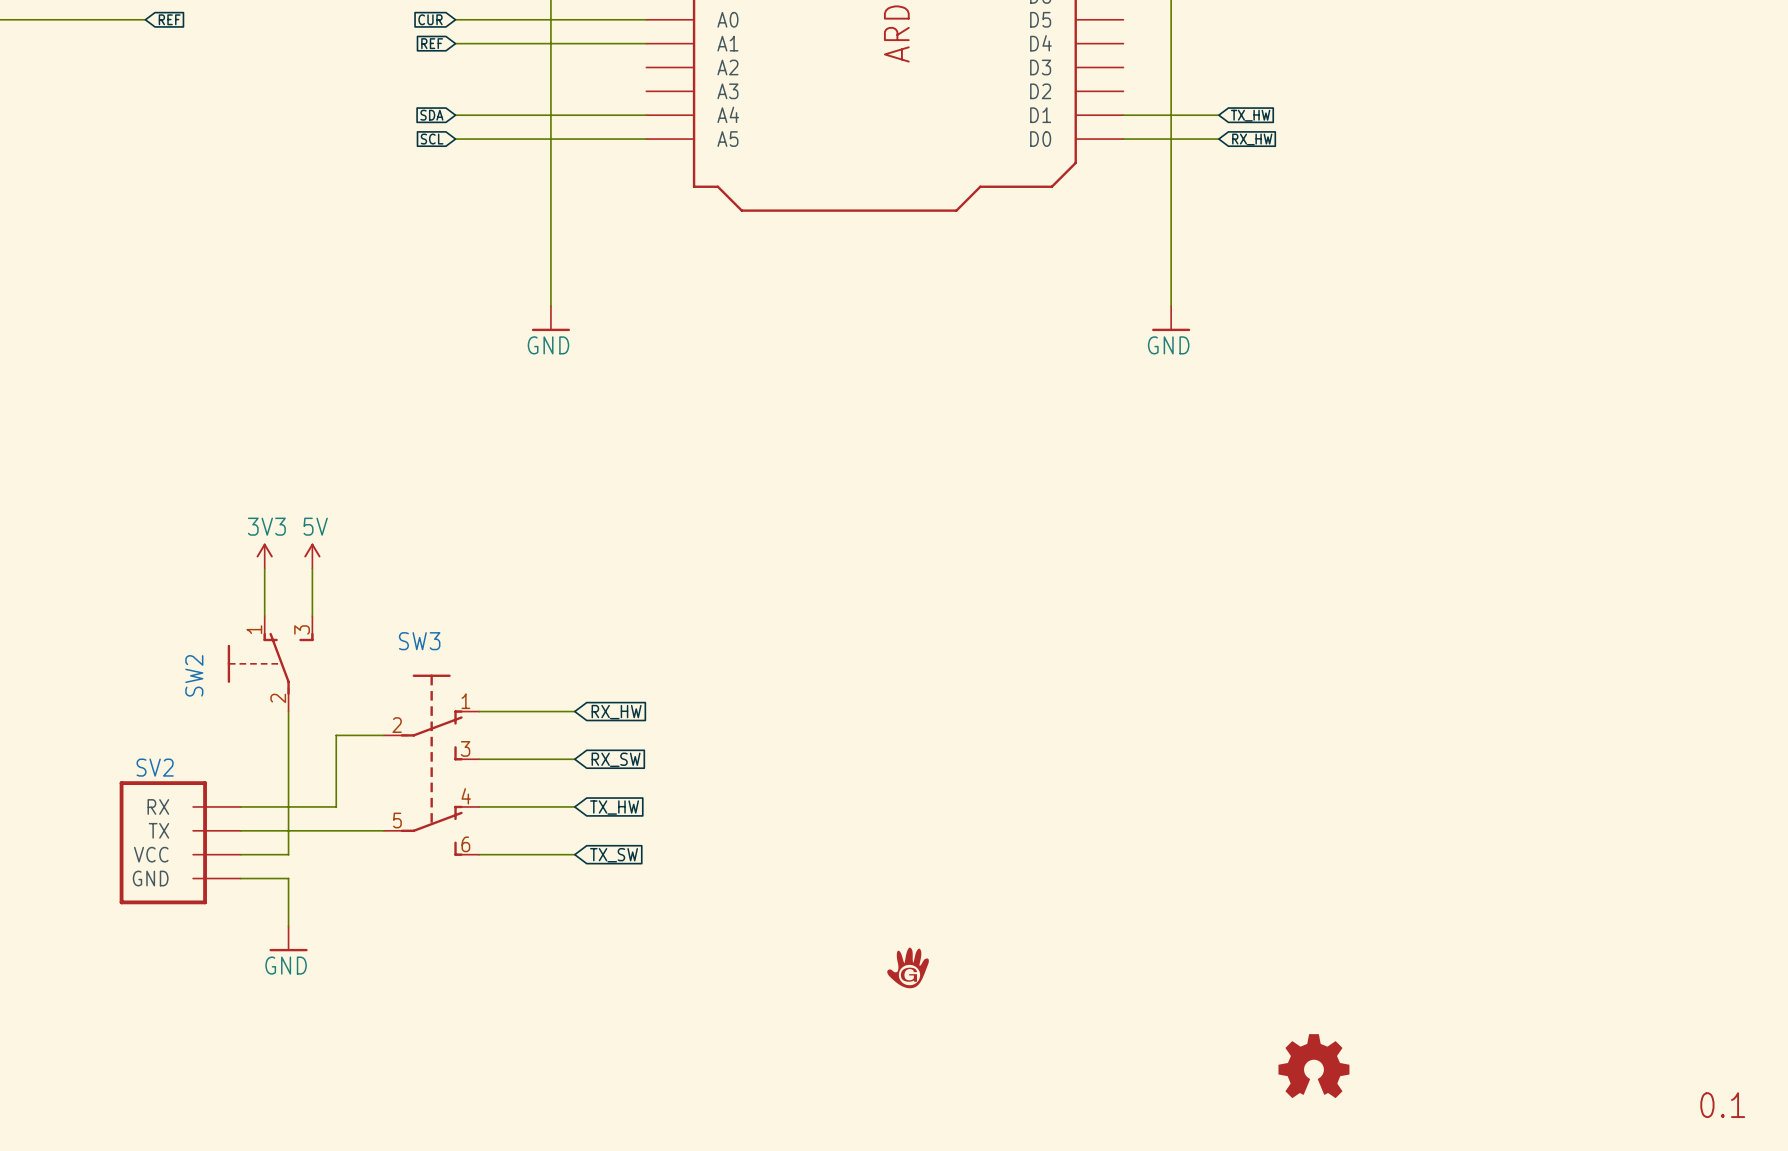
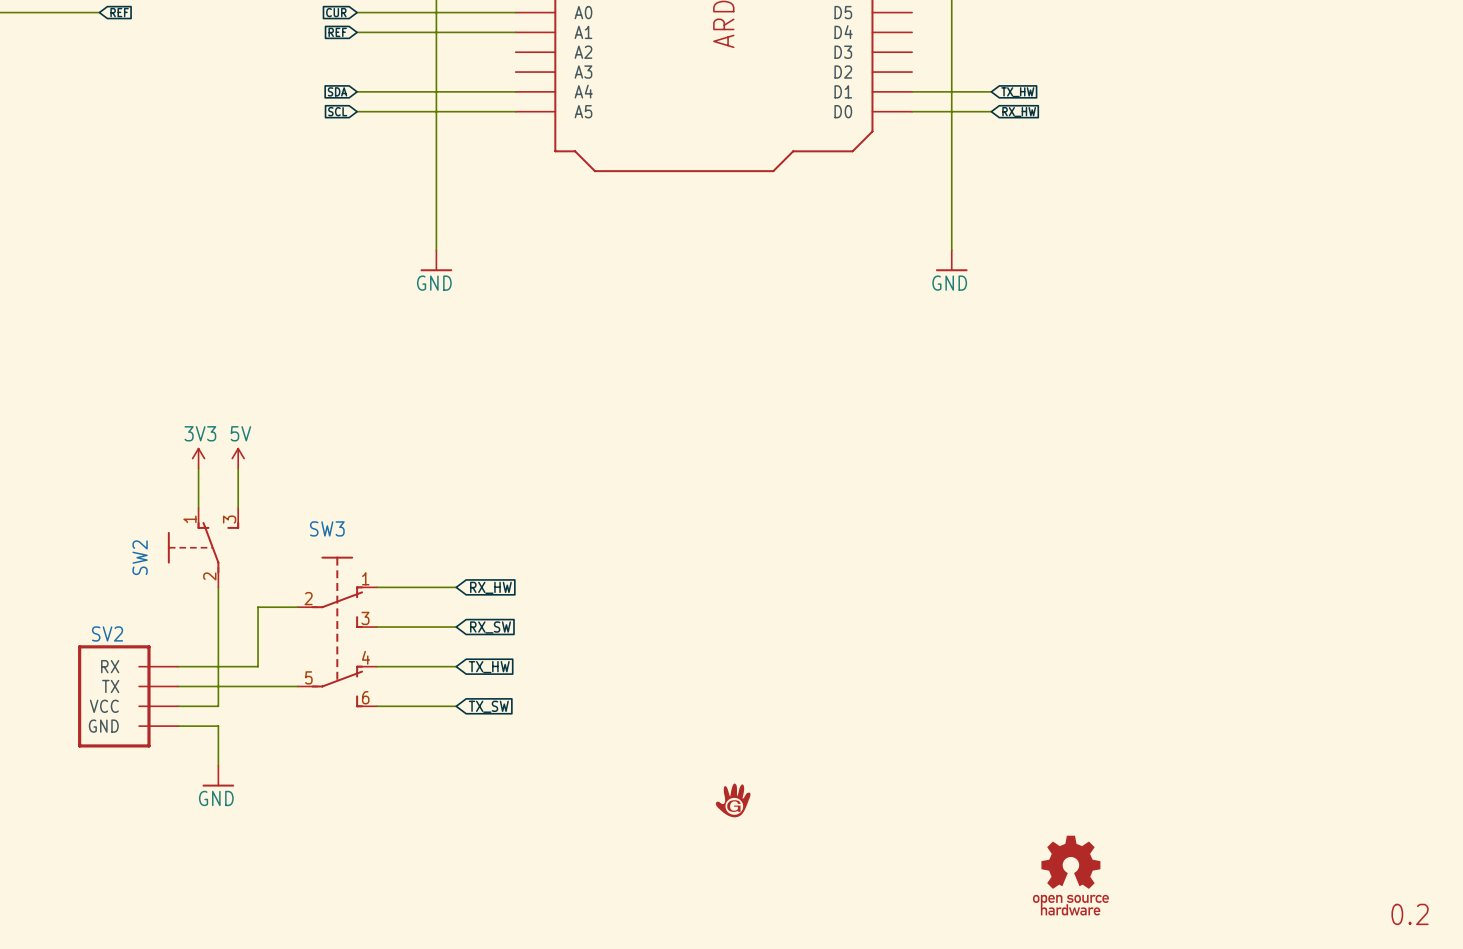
part symbol: [1278, 1034, 1350, 1099] -> [1032, 835, 1109, 916]
text: 0.1 (1722, 1105) -> 0.2 (1410, 914)

